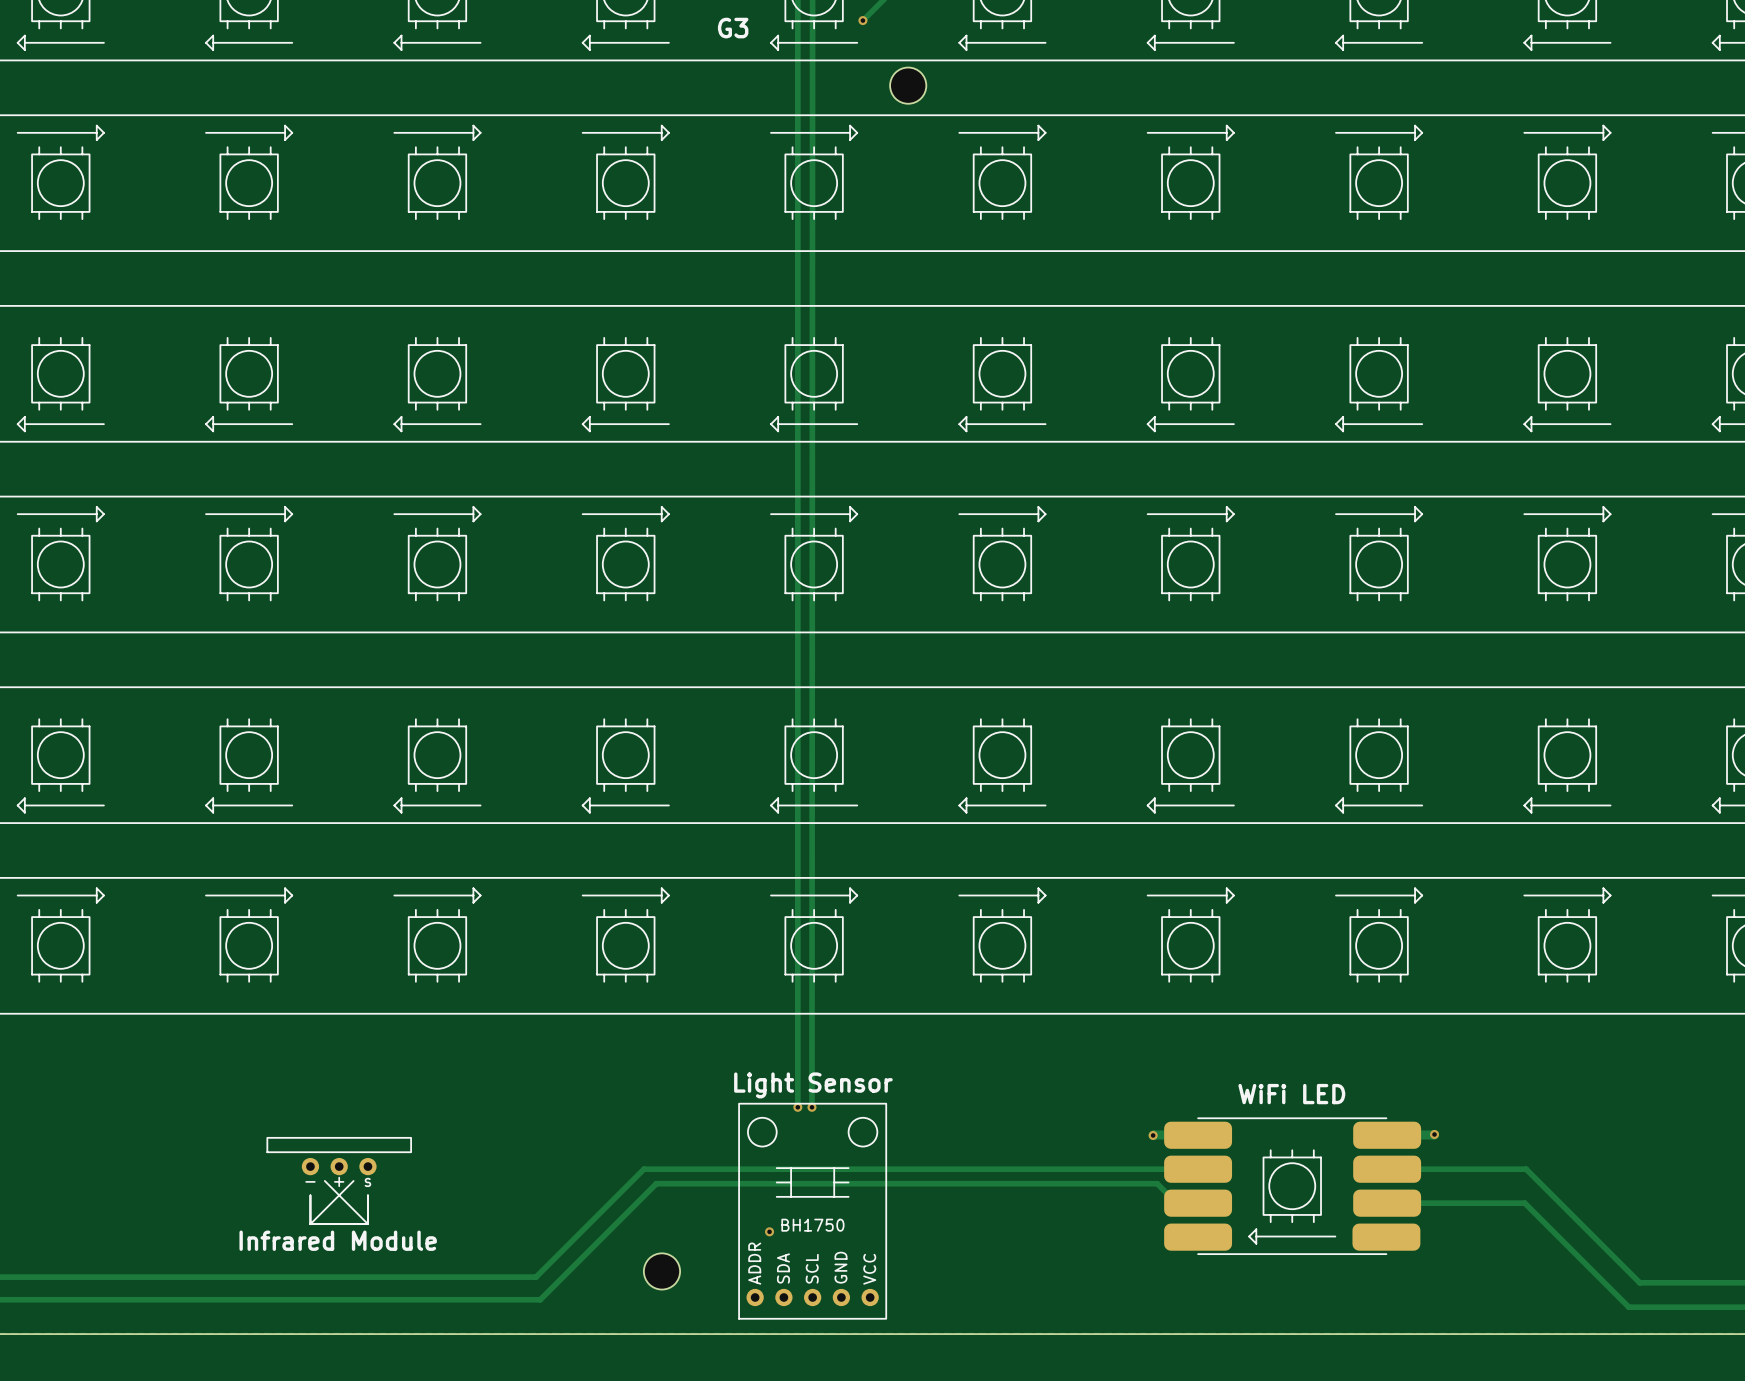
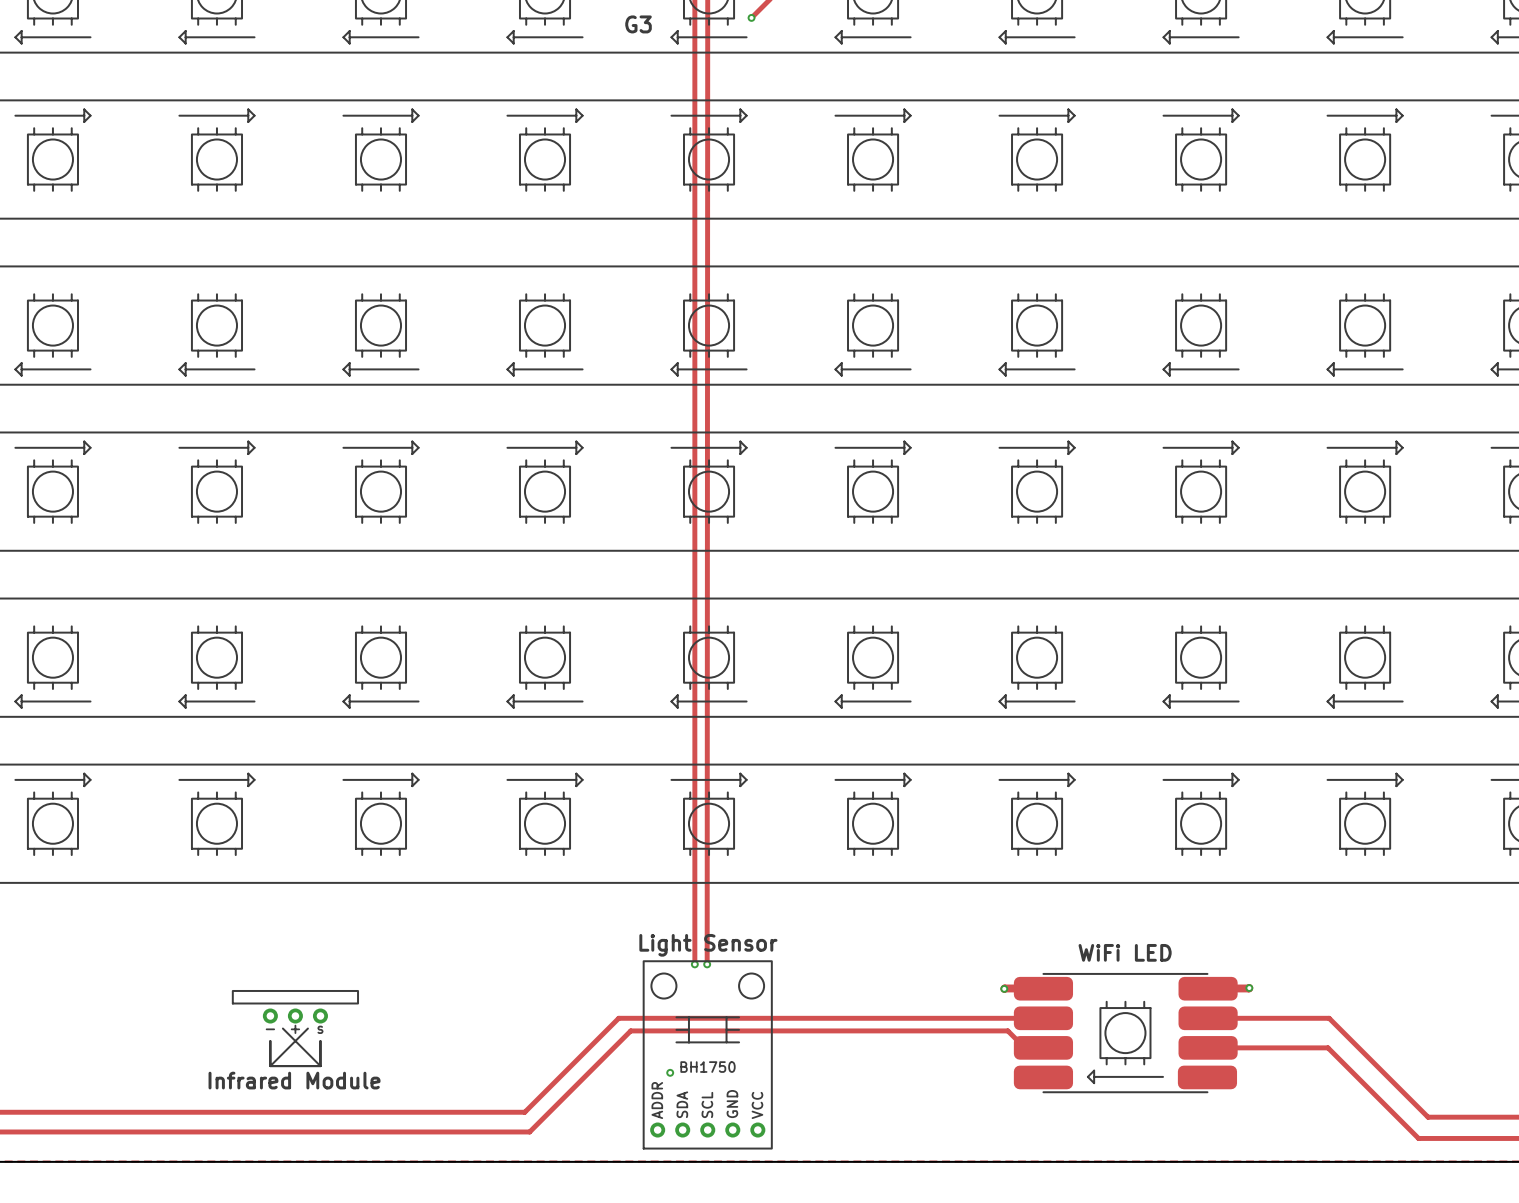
part: (908, 85) -> none
track: (710, 1169) (643, 1169) (536, 1277) -> (618, 1018) (524, 1112) (466, 1112)
track: (724, 1183) (656, 1183) (540, 1299) -> (630, 1030) (529, 1131) (470, 1131)
part: (661, 1271) -> none

